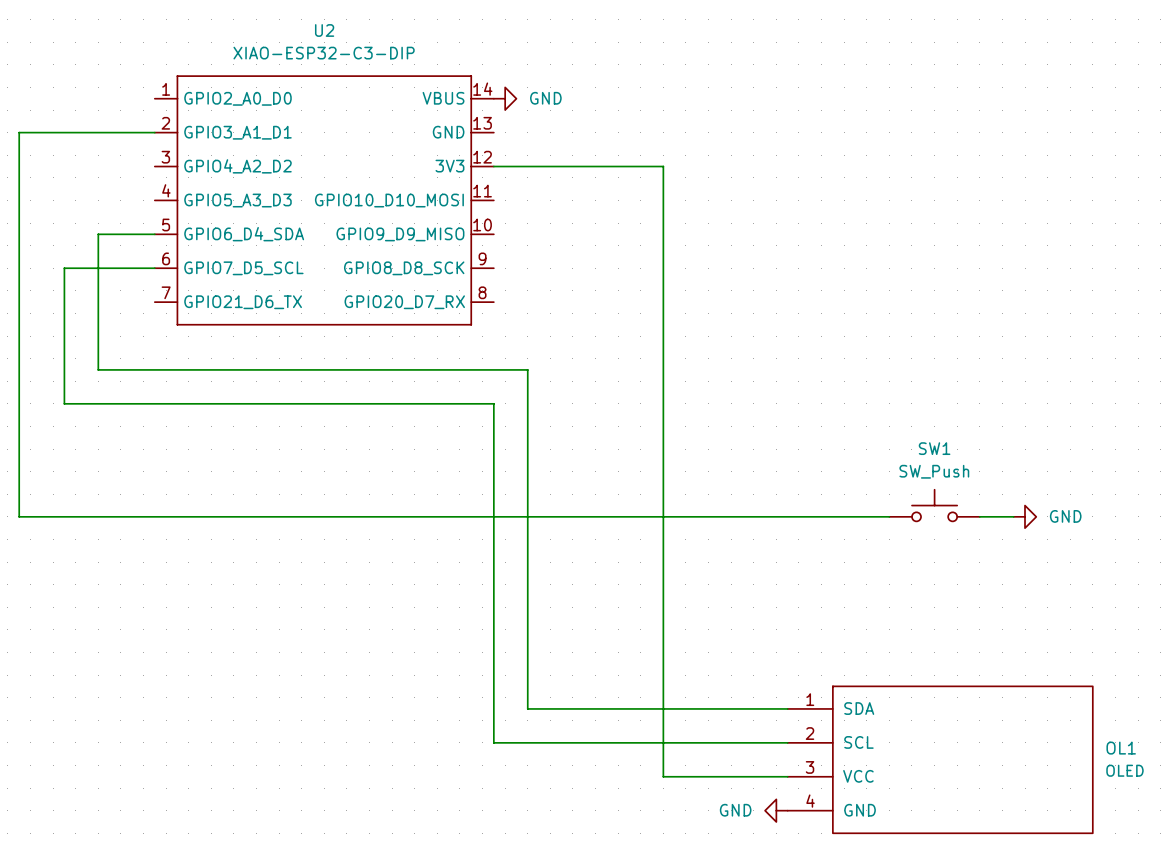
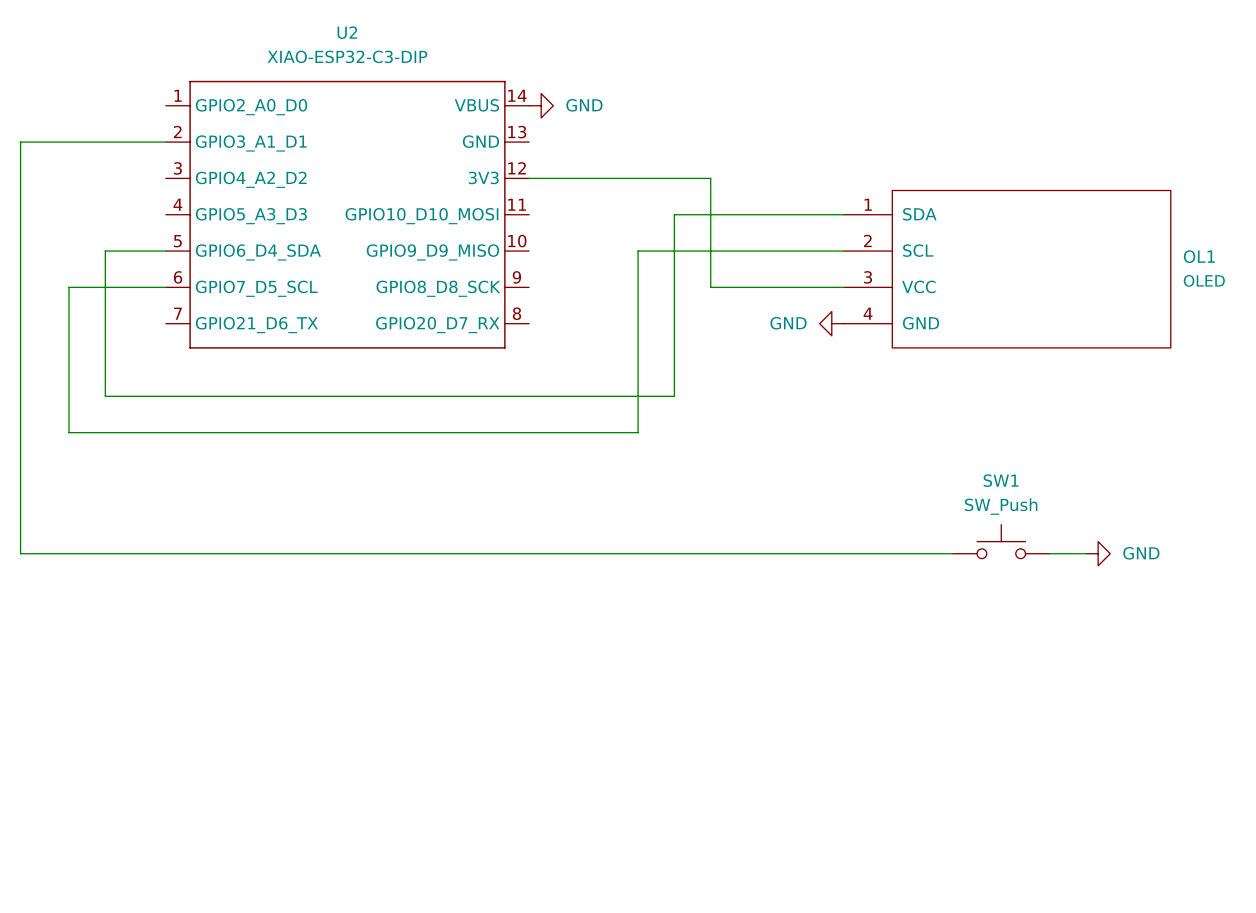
wire: (663, 268) (663, 776) (787, 776) -> (710, 287) (843, 287)
power symbol: none -> GND (831, 323)
wire: (527, 369) (527, 708) (787, 708) -> (565, 396) (674, 396) (674, 214) (843, 214)
wire: (493, 403) (493, 742) (787, 742) -> (529, 432) (638, 432) (638, 251) (843, 251)
OL1 position: (940, 759) -> (1007, 269)
power symbol: GND (776, 810) -> none

